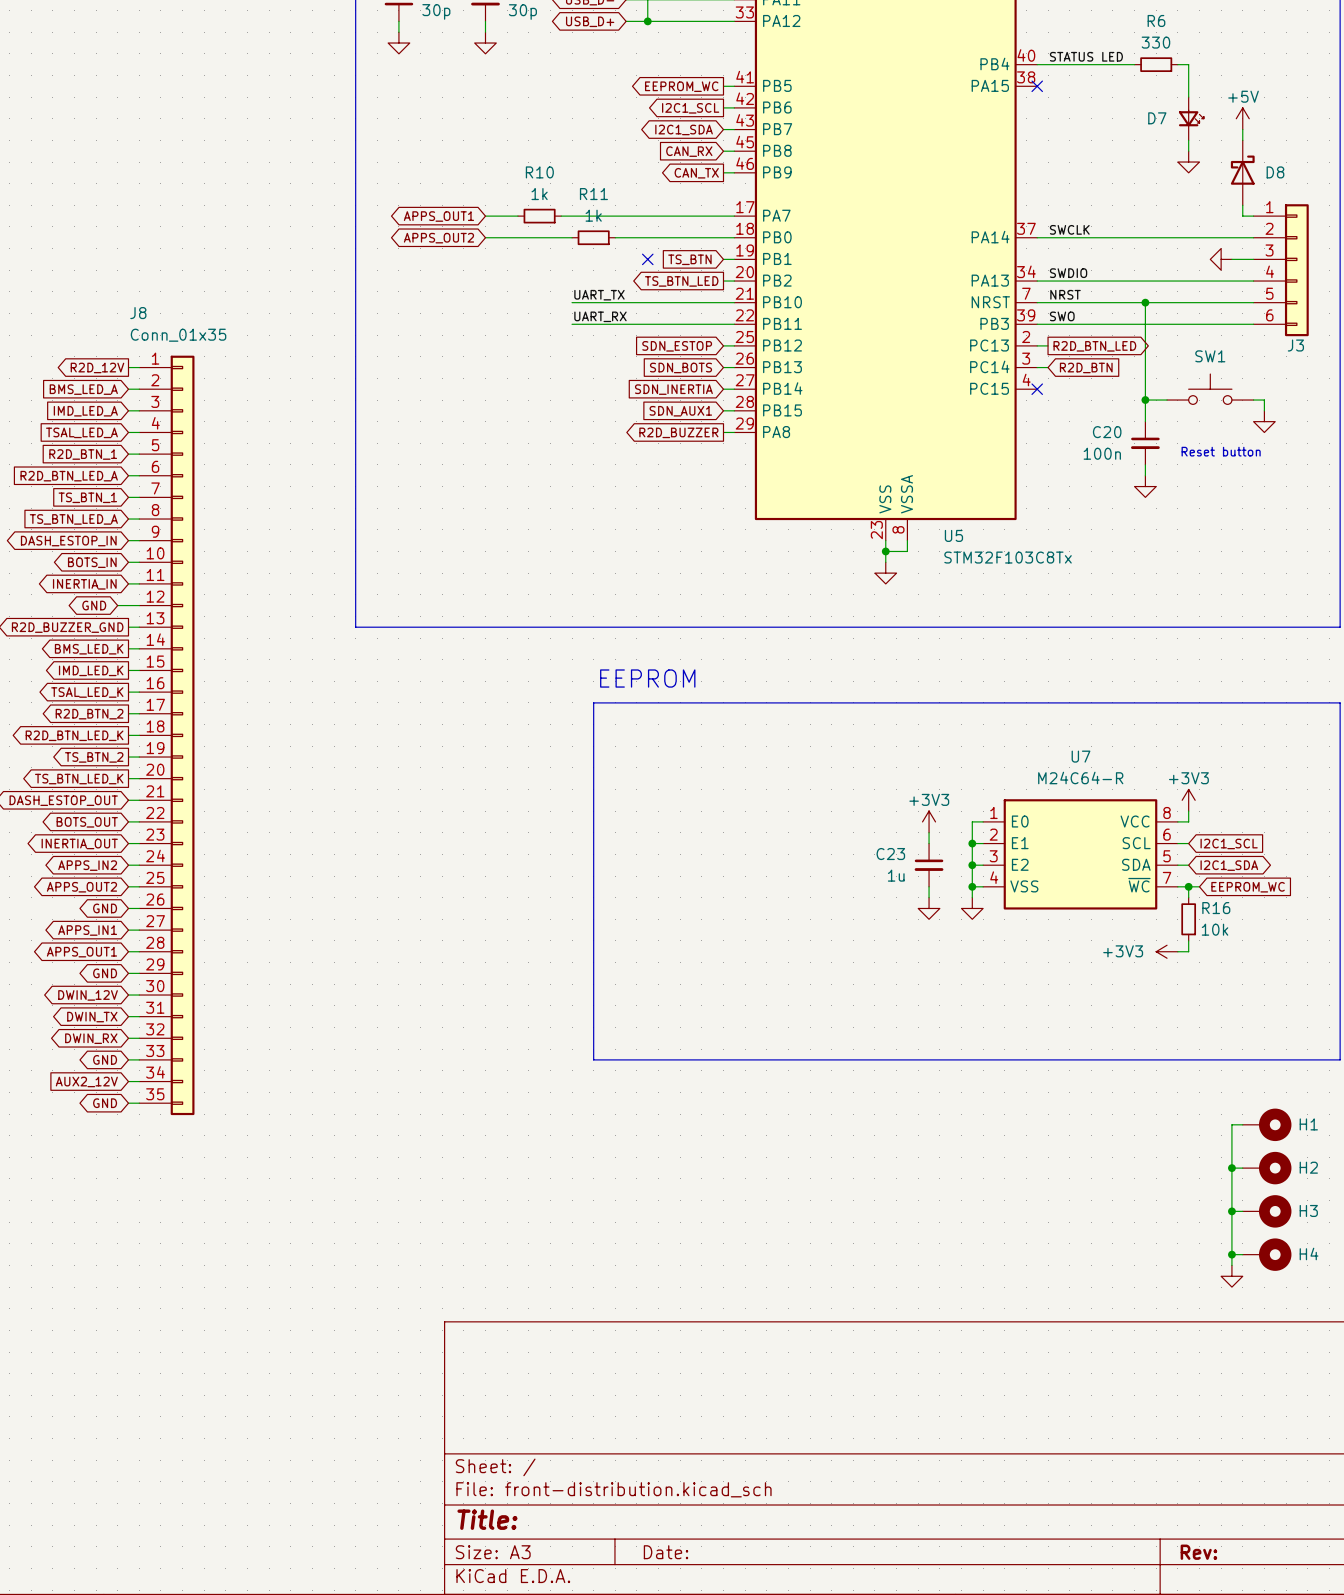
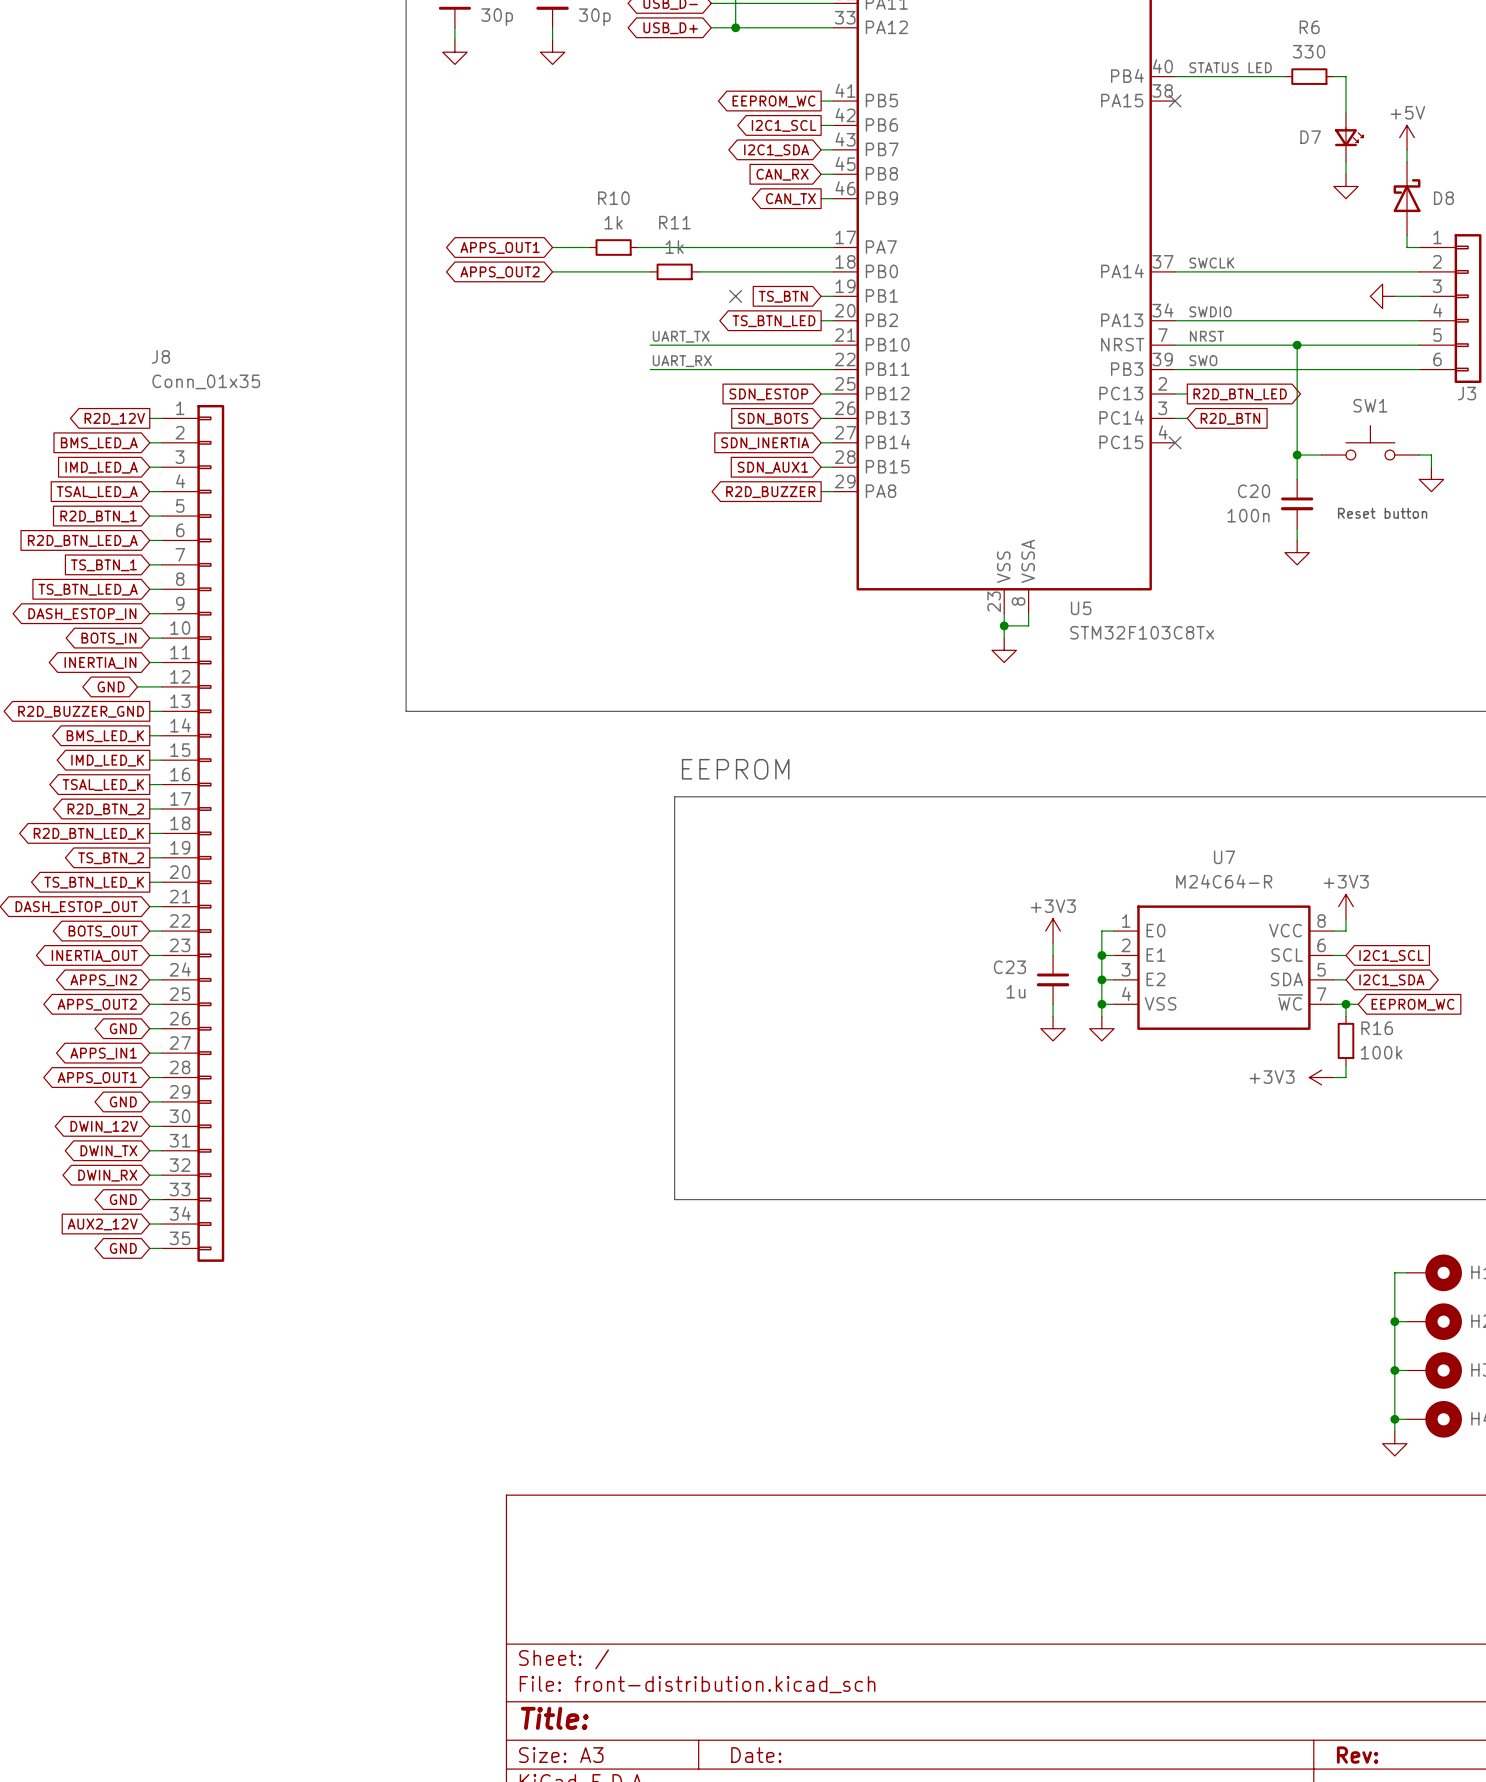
R16 value: 10k (1215, 929) -> 100k (1381, 1052)

